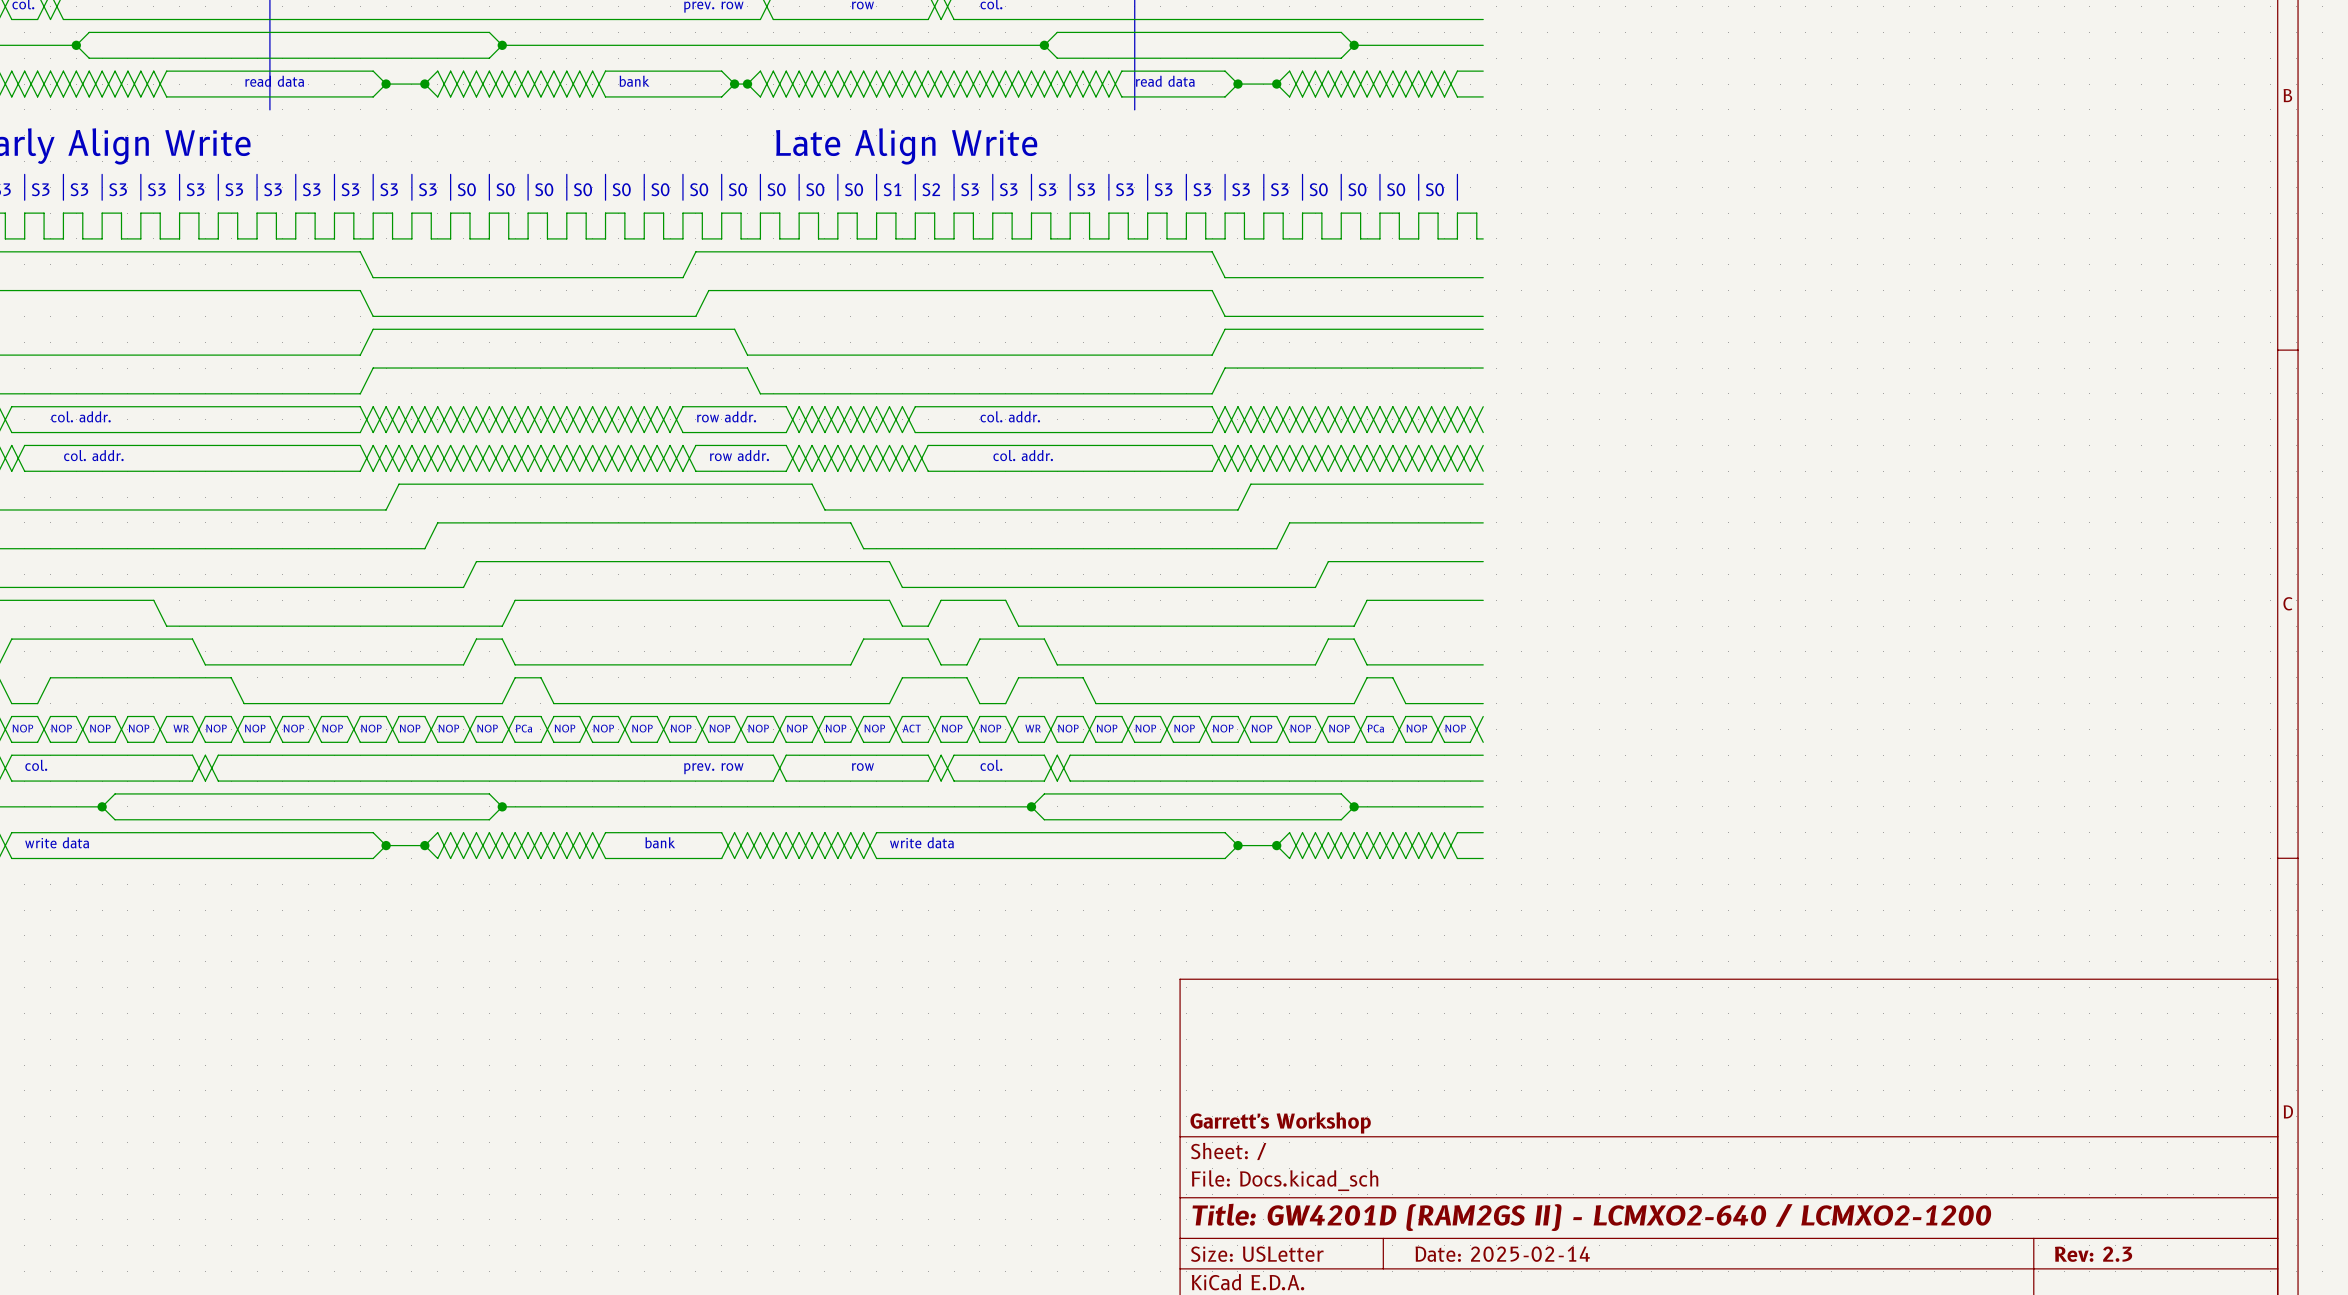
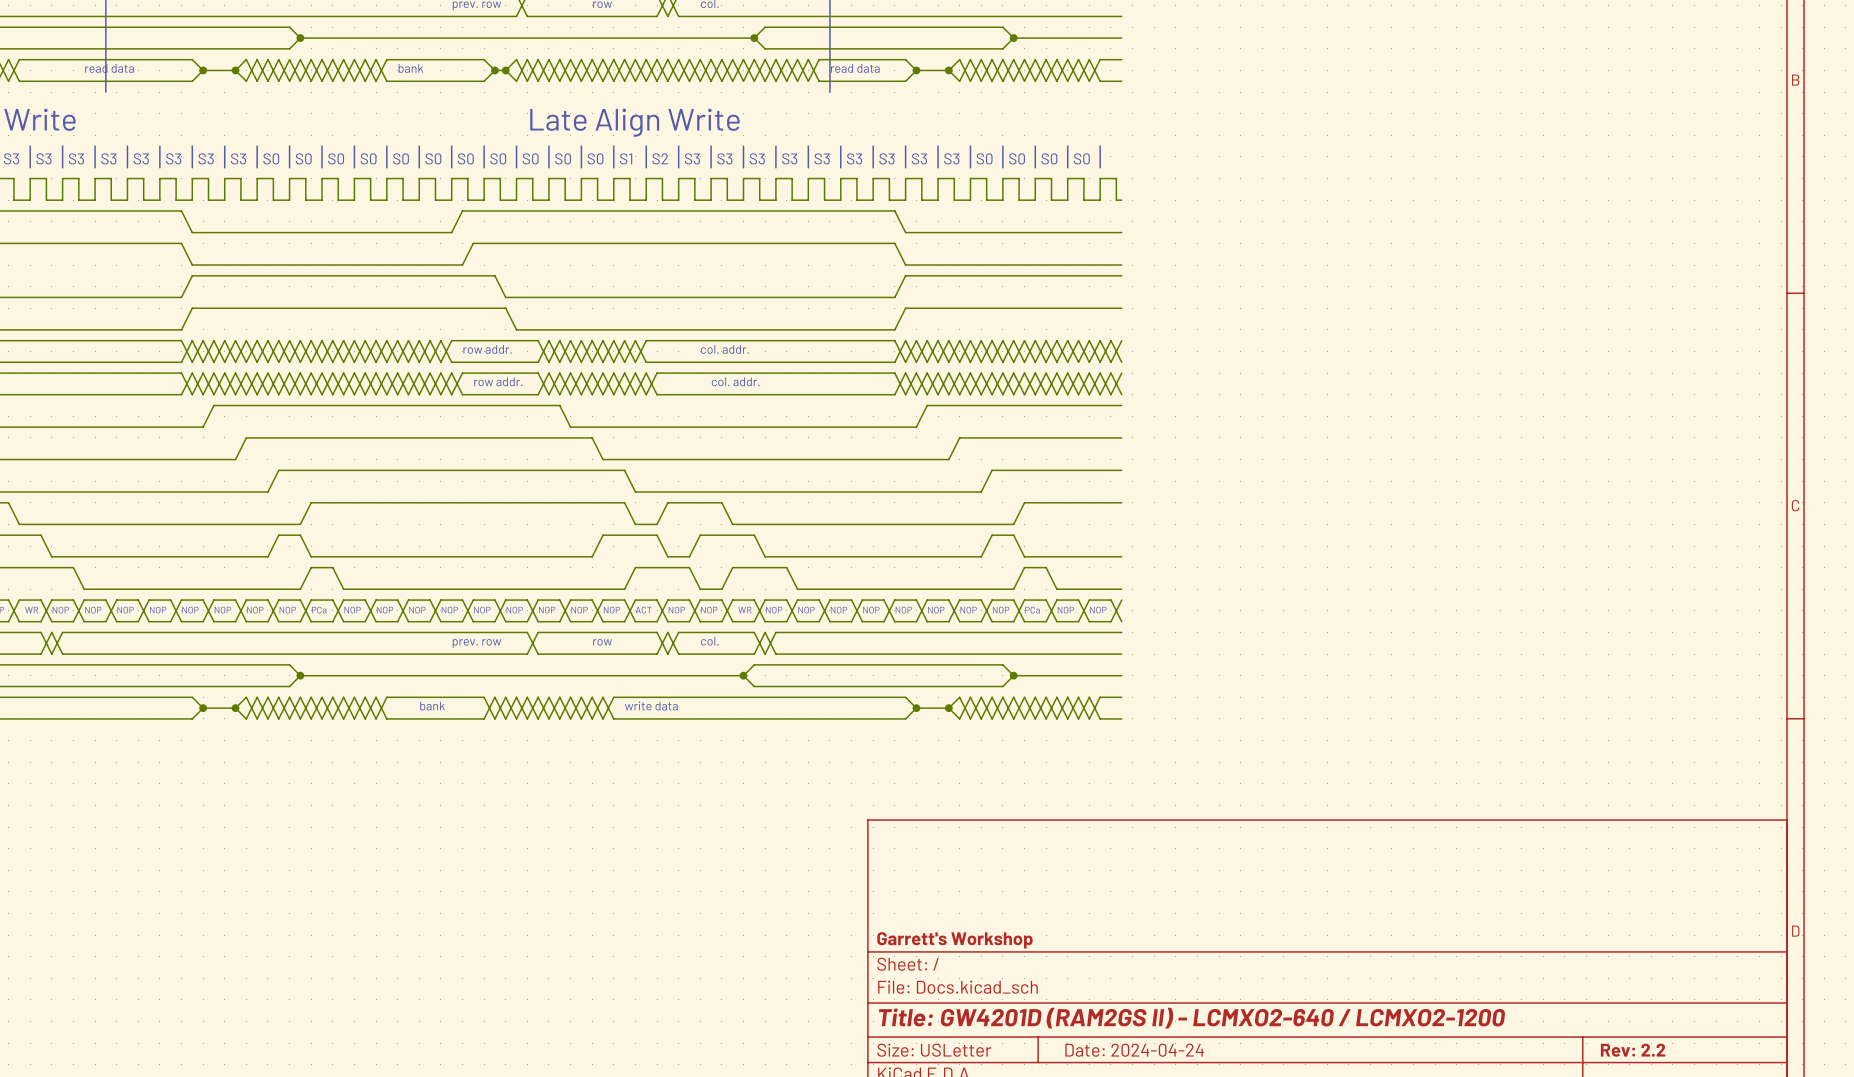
title block: Date: 2025-02-14 (1502, 1254) -> Date: 2024-04-24 (1134, 1050)
title block: Rev: 2.3 (2093, 1254) -> Rev: 2.2 (1633, 1050)

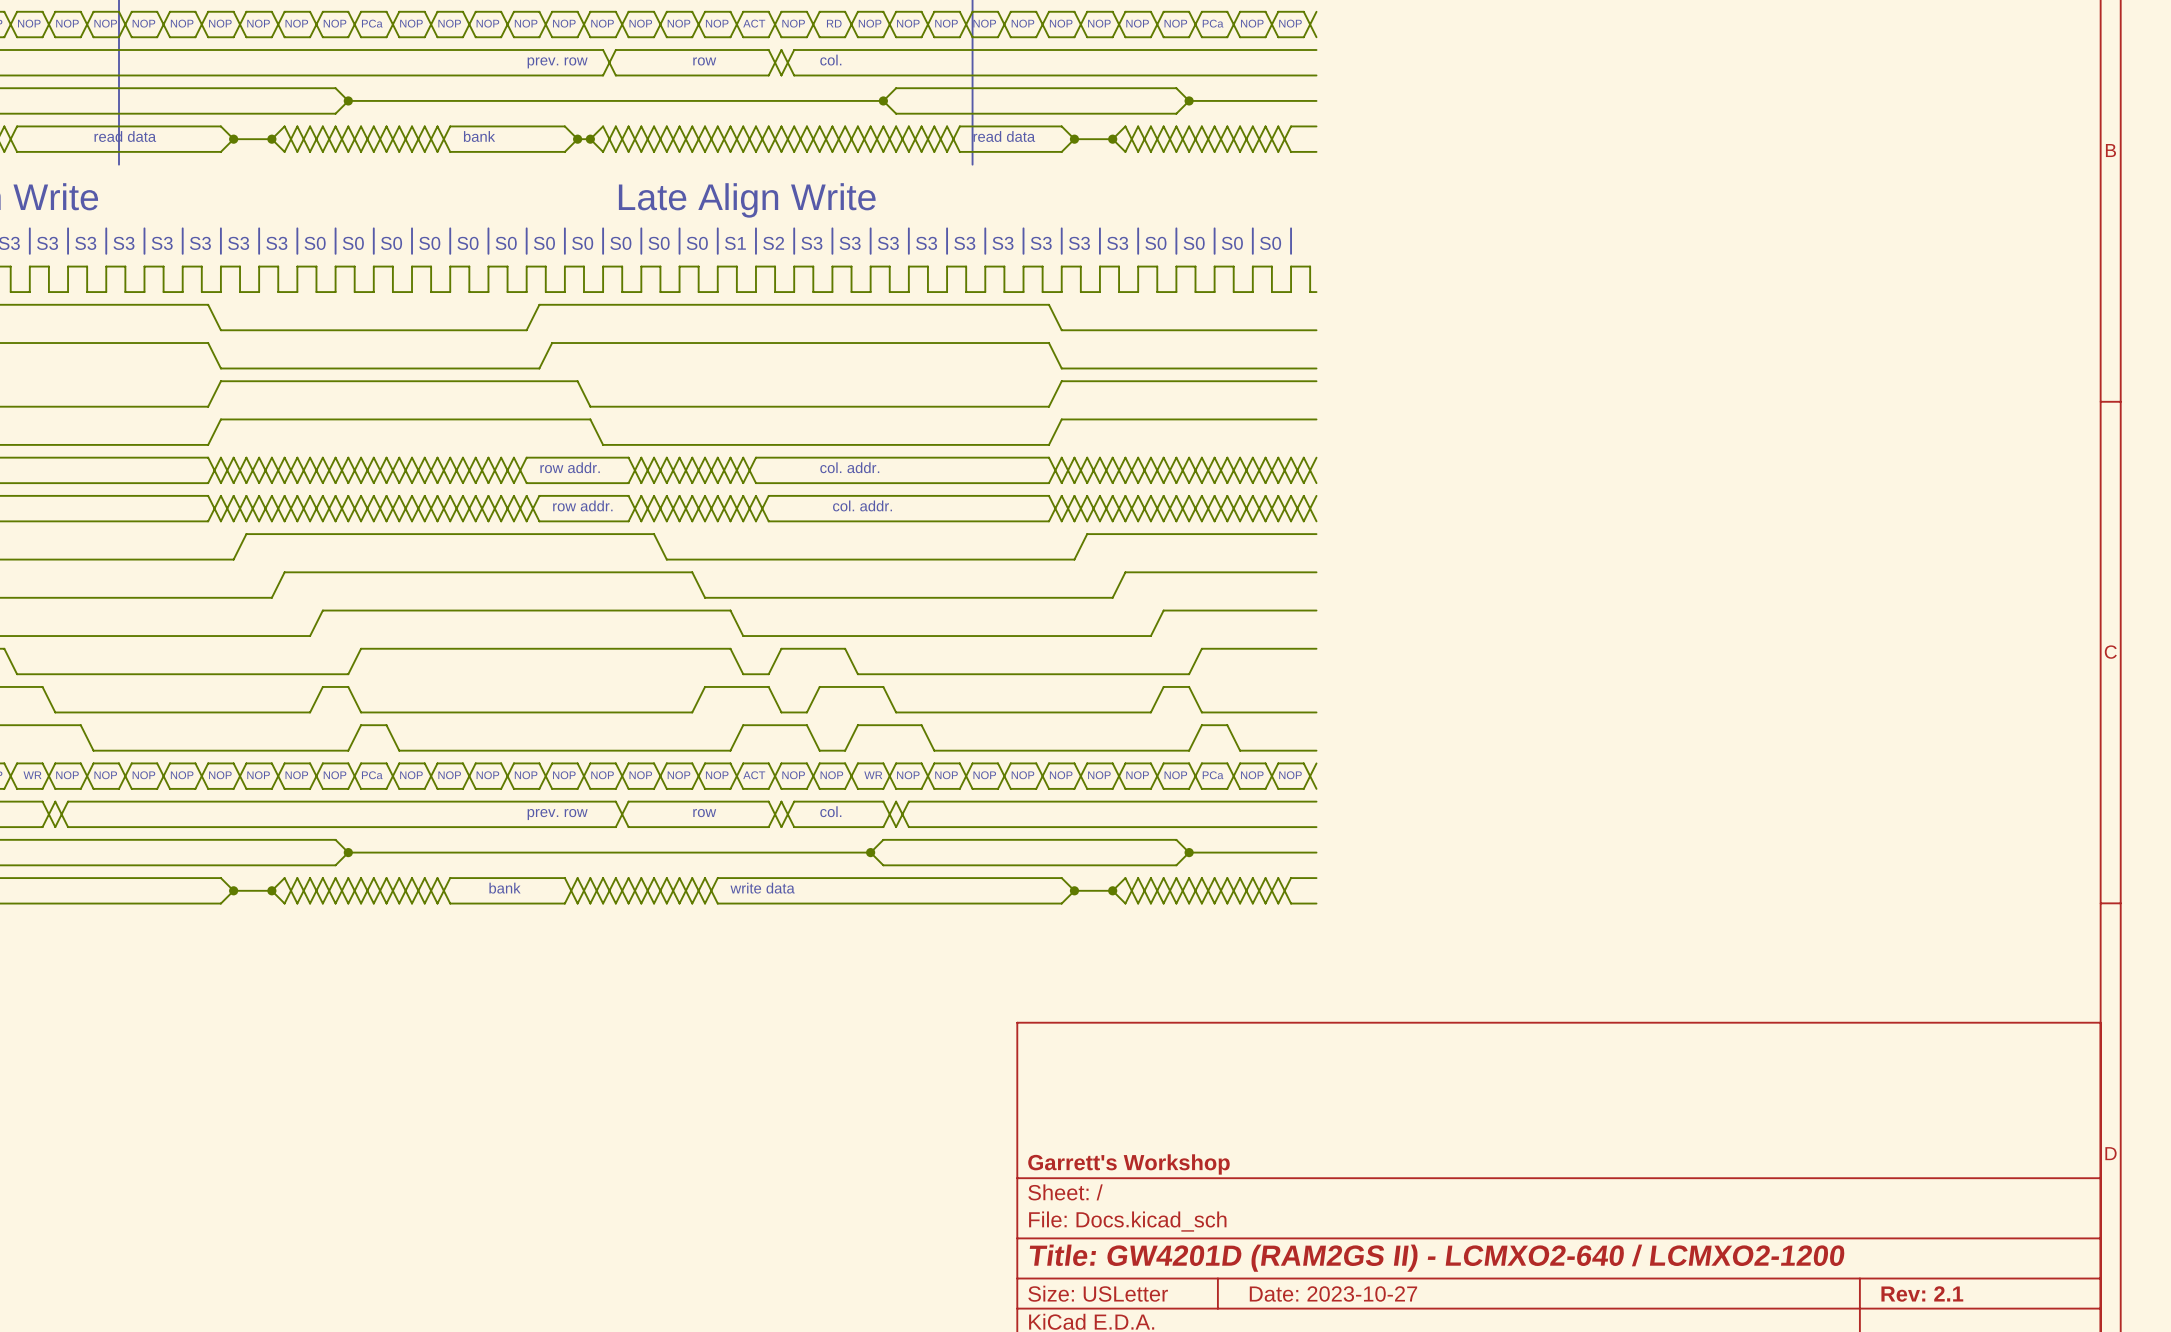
title block: Date: 2024-04-24 (1134, 1050) -> Date: 2023-10-27 (1333, 1293)
title block: Rev: 2.2 (1633, 1050) -> Rev: 2.1 (1922, 1293)

